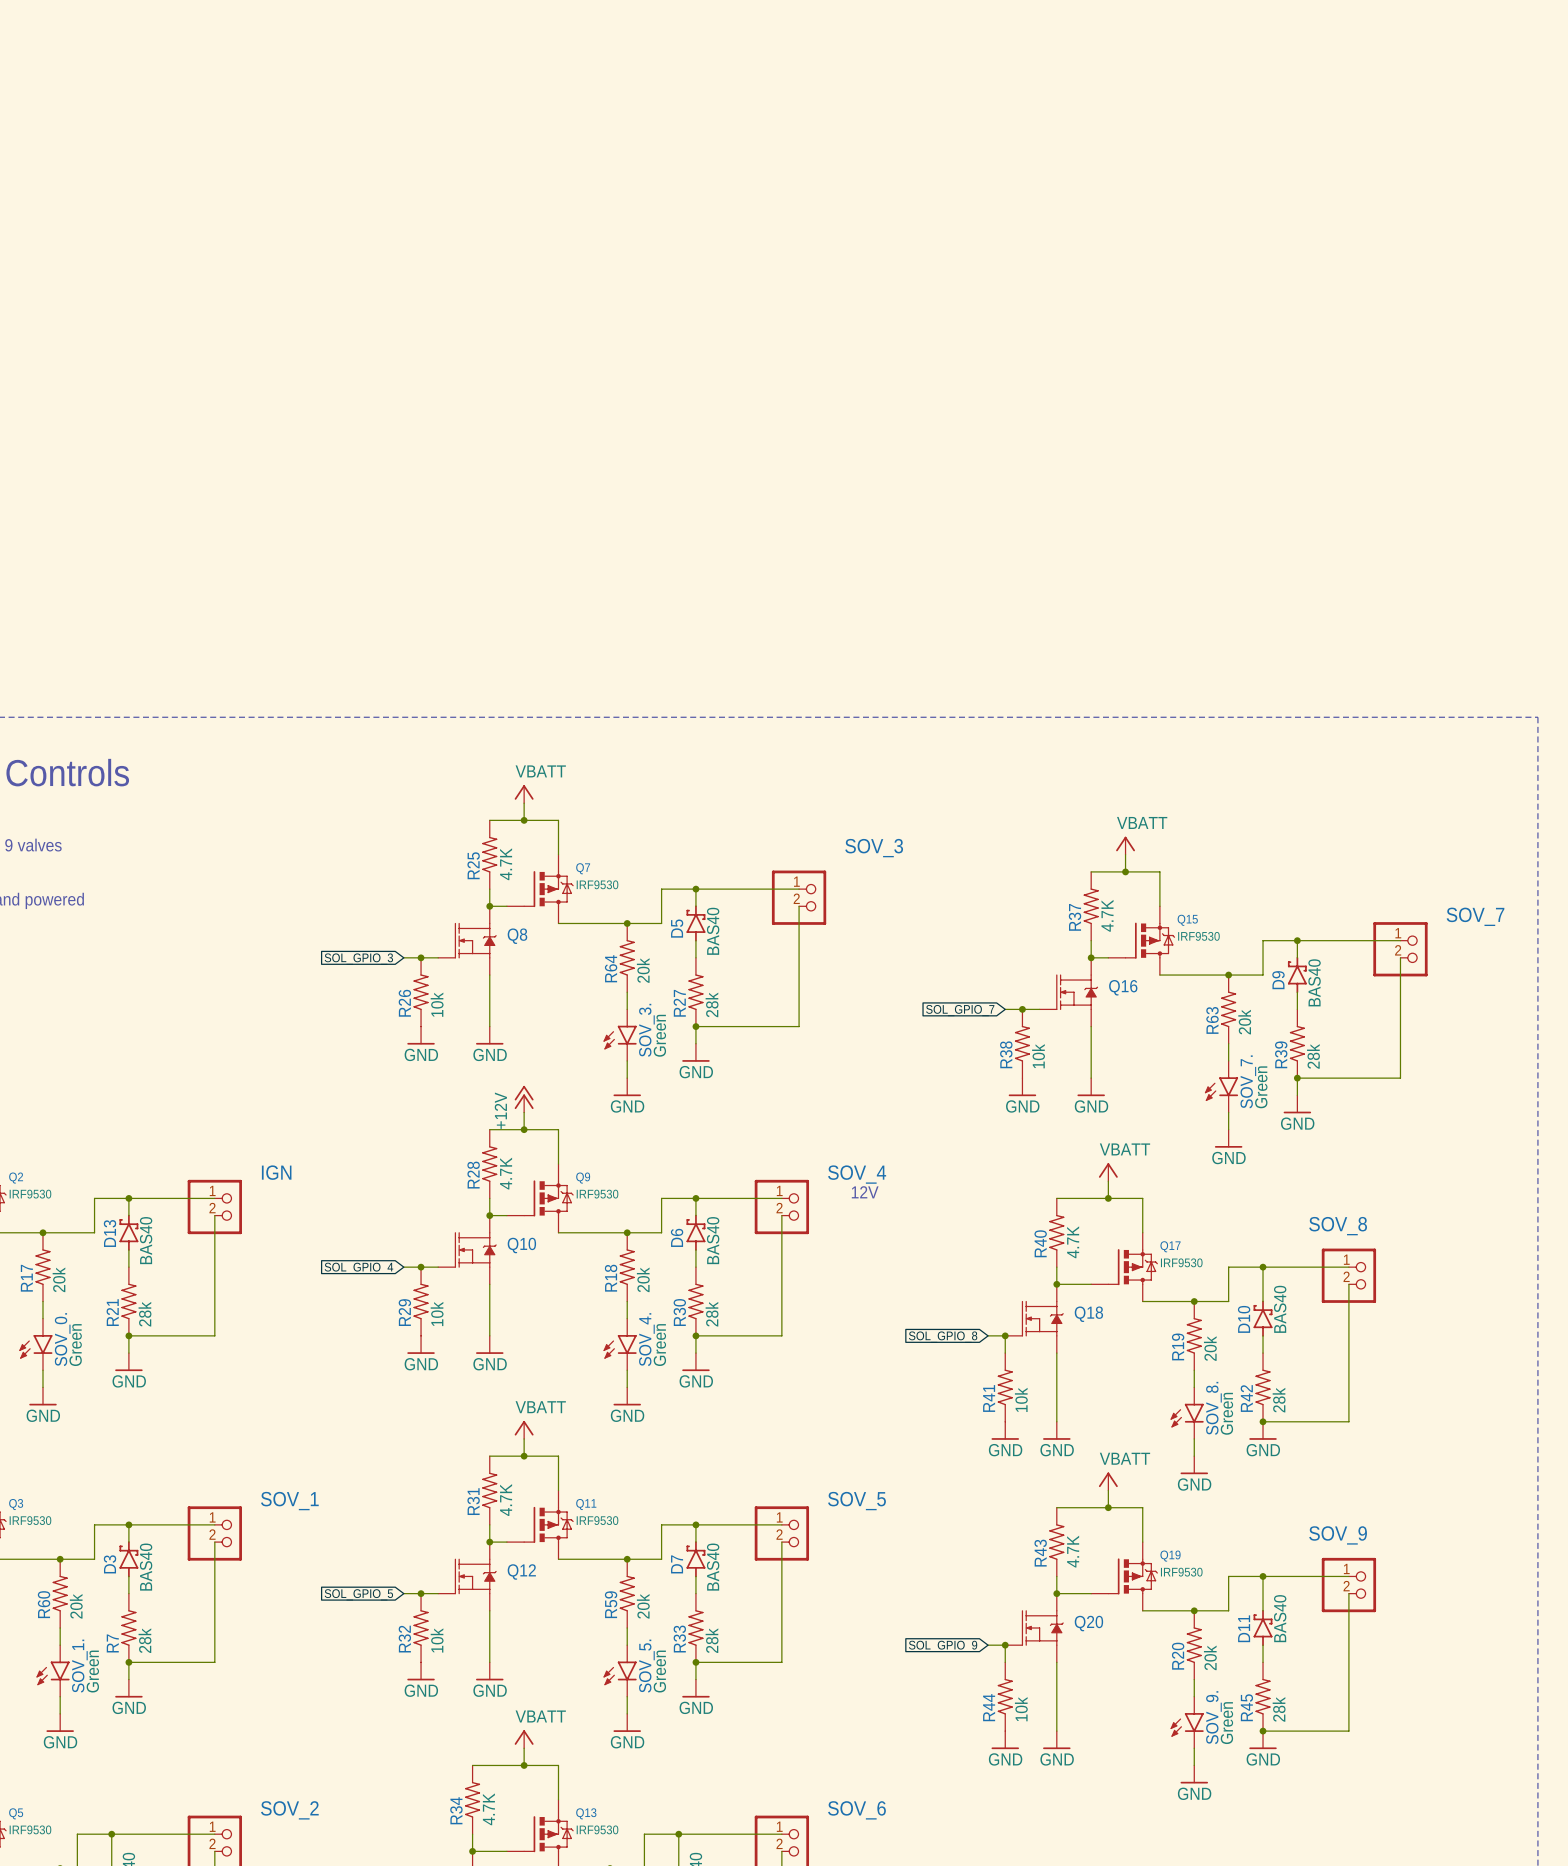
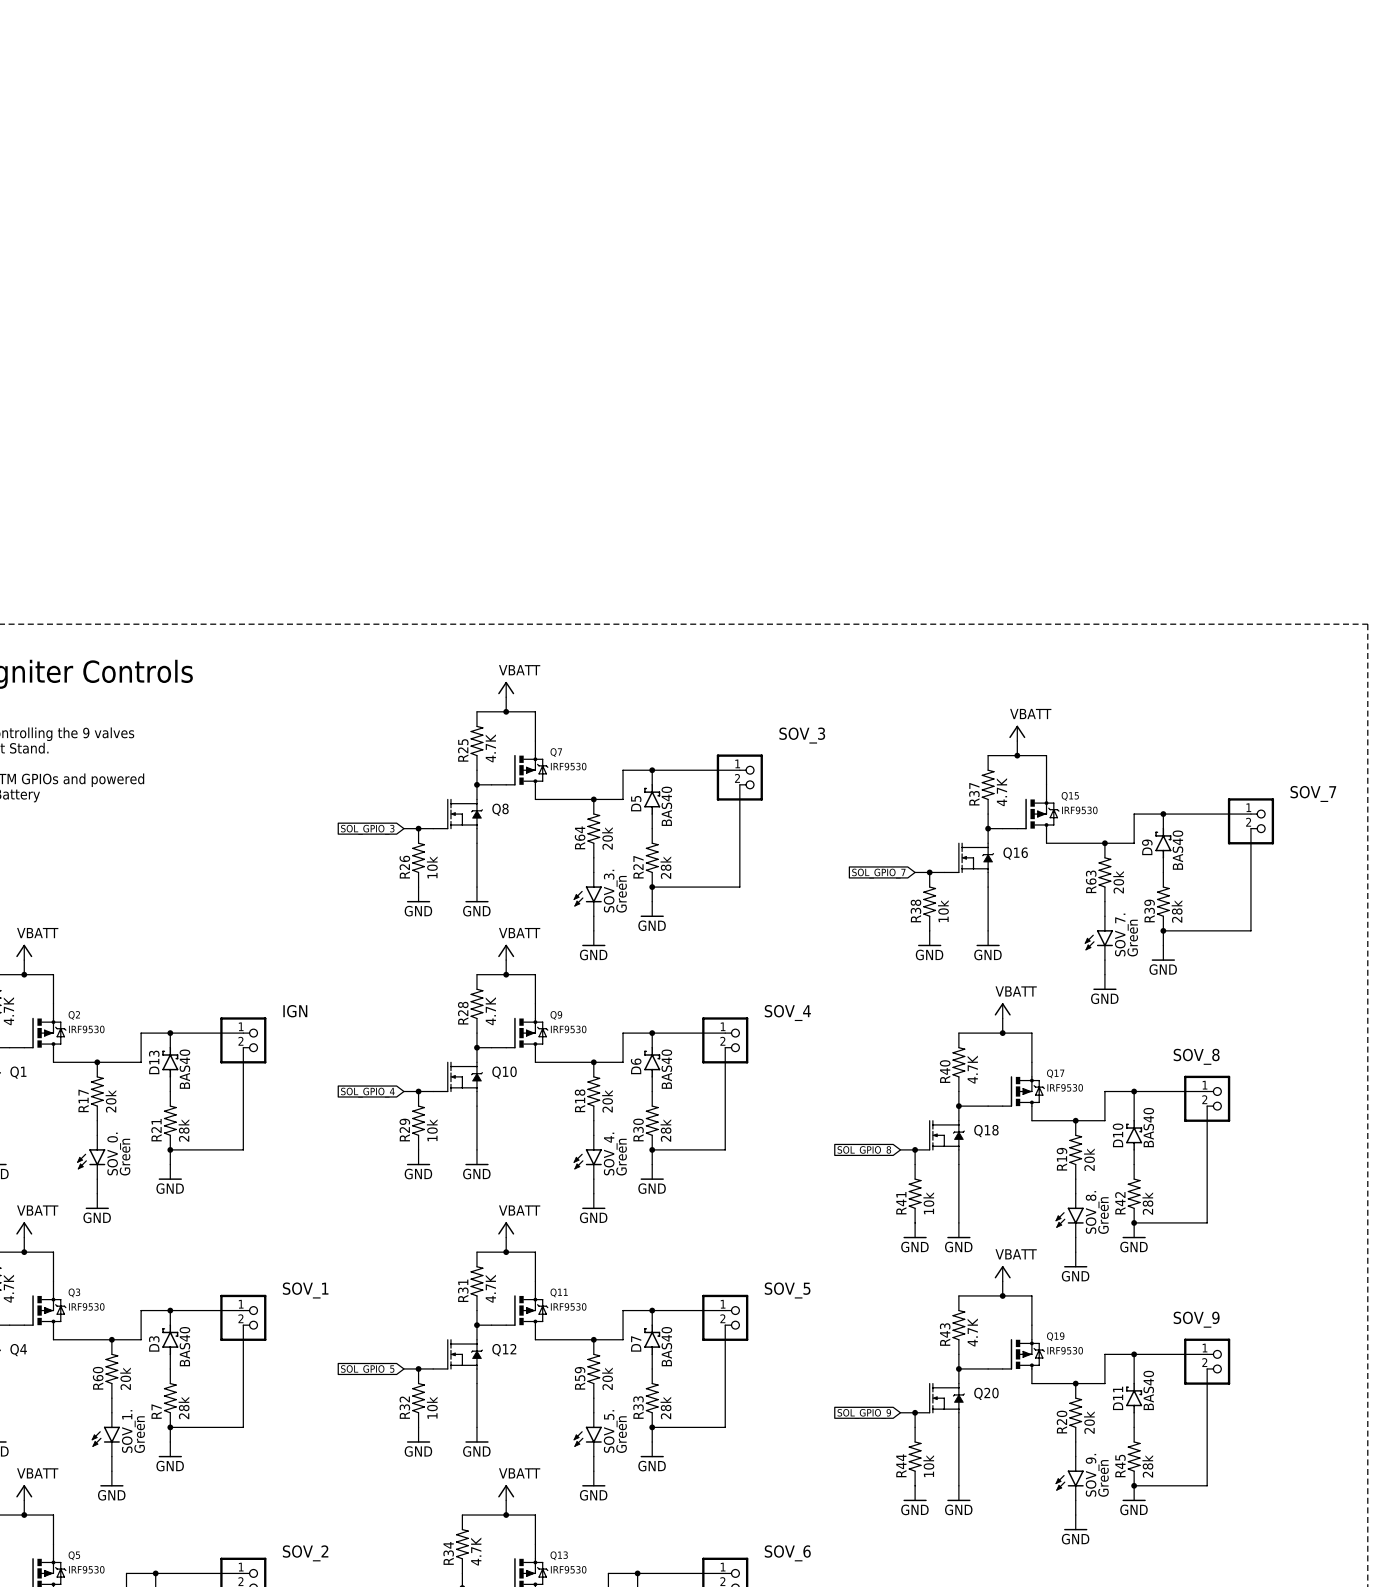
power symbol: +12V (524, 1099) -> VBATT (506, 952)
text: 12V (865, 1192) -> none

